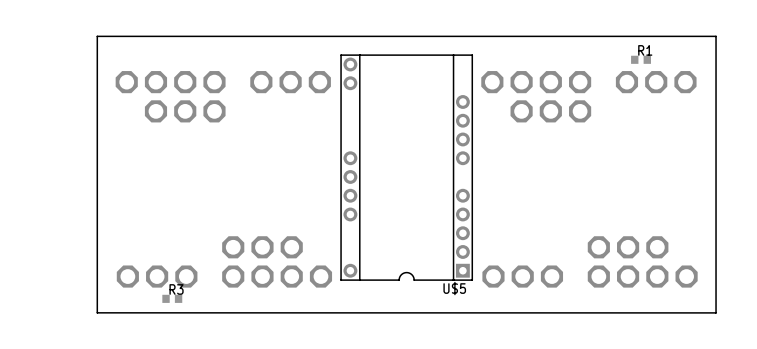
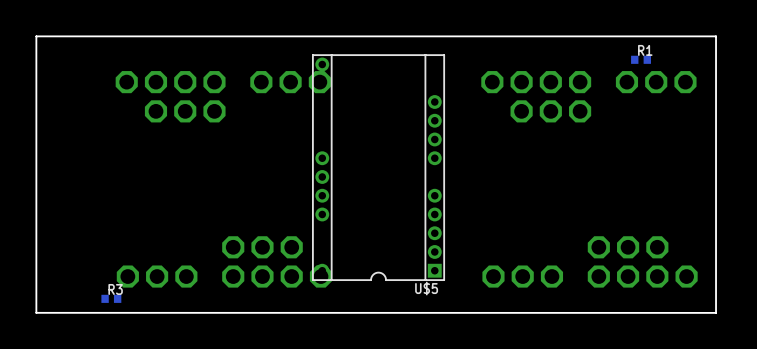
board edge: (97, 36) (97, 312) -> (97, 36) (36, 36) (36, 312) (97, 312)
U$5 position: (406, 167) -> (378, 167)
R3 position: (172, 298) -> (111, 298)

